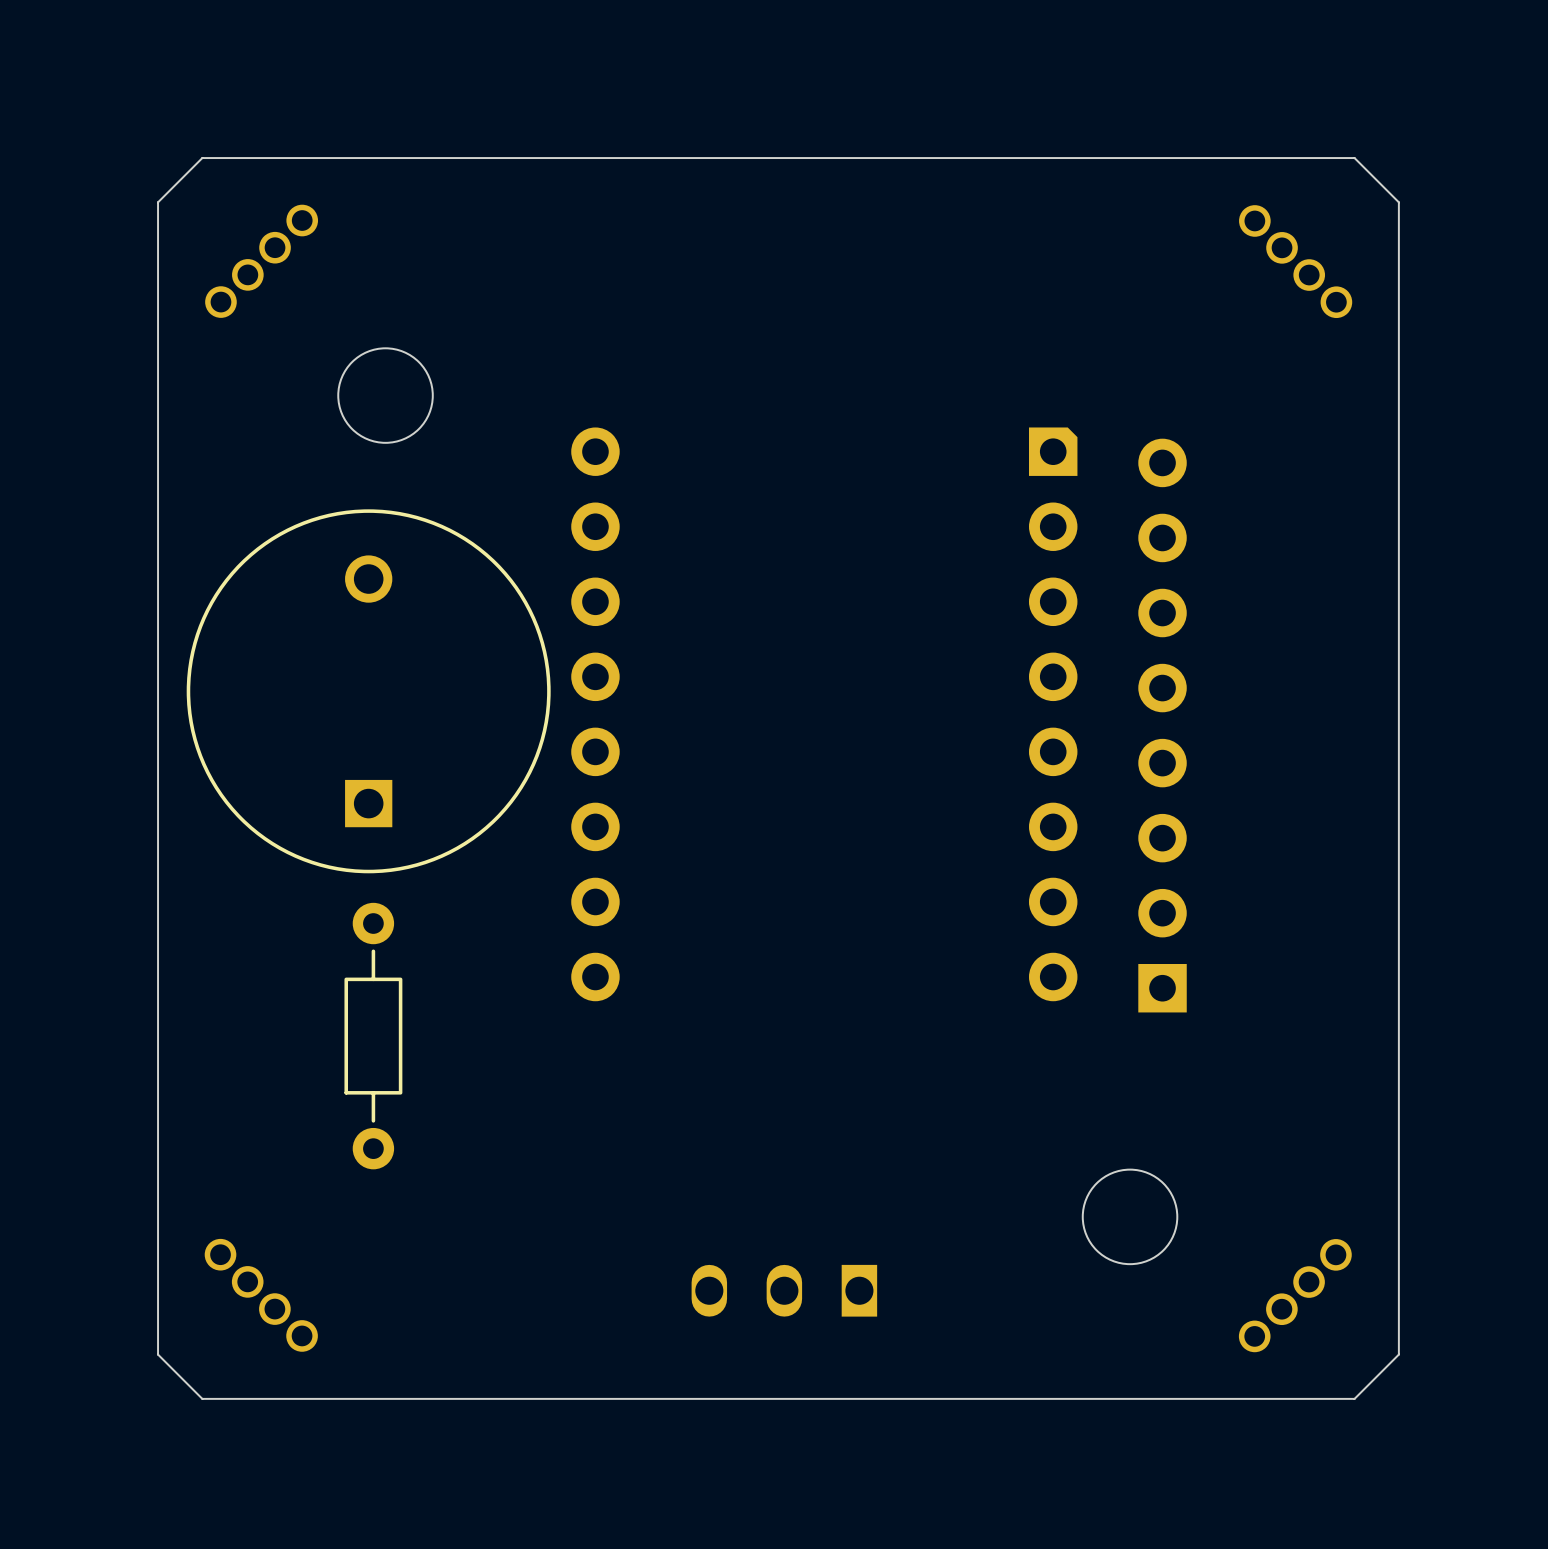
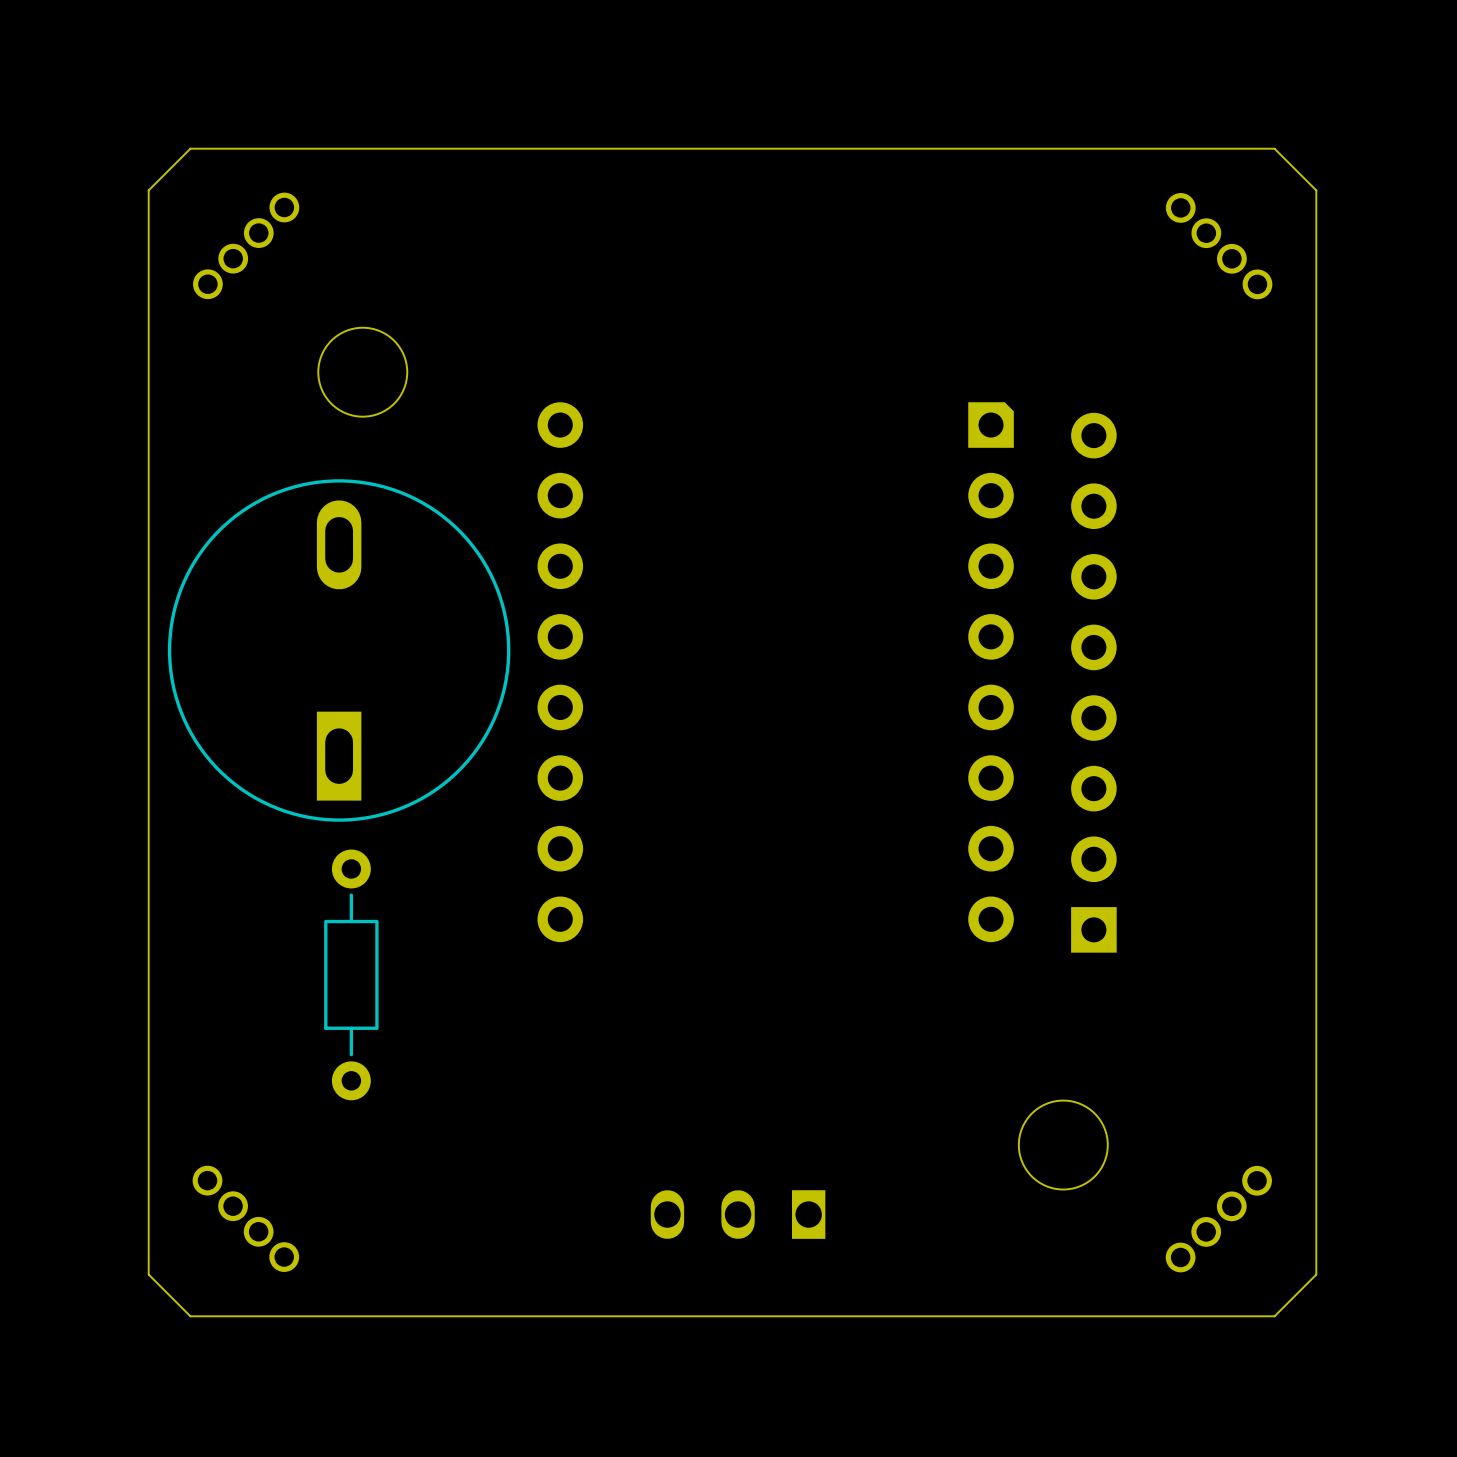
part footprint: [186, 509, 551, 874] -> [167, 479, 511, 822]

